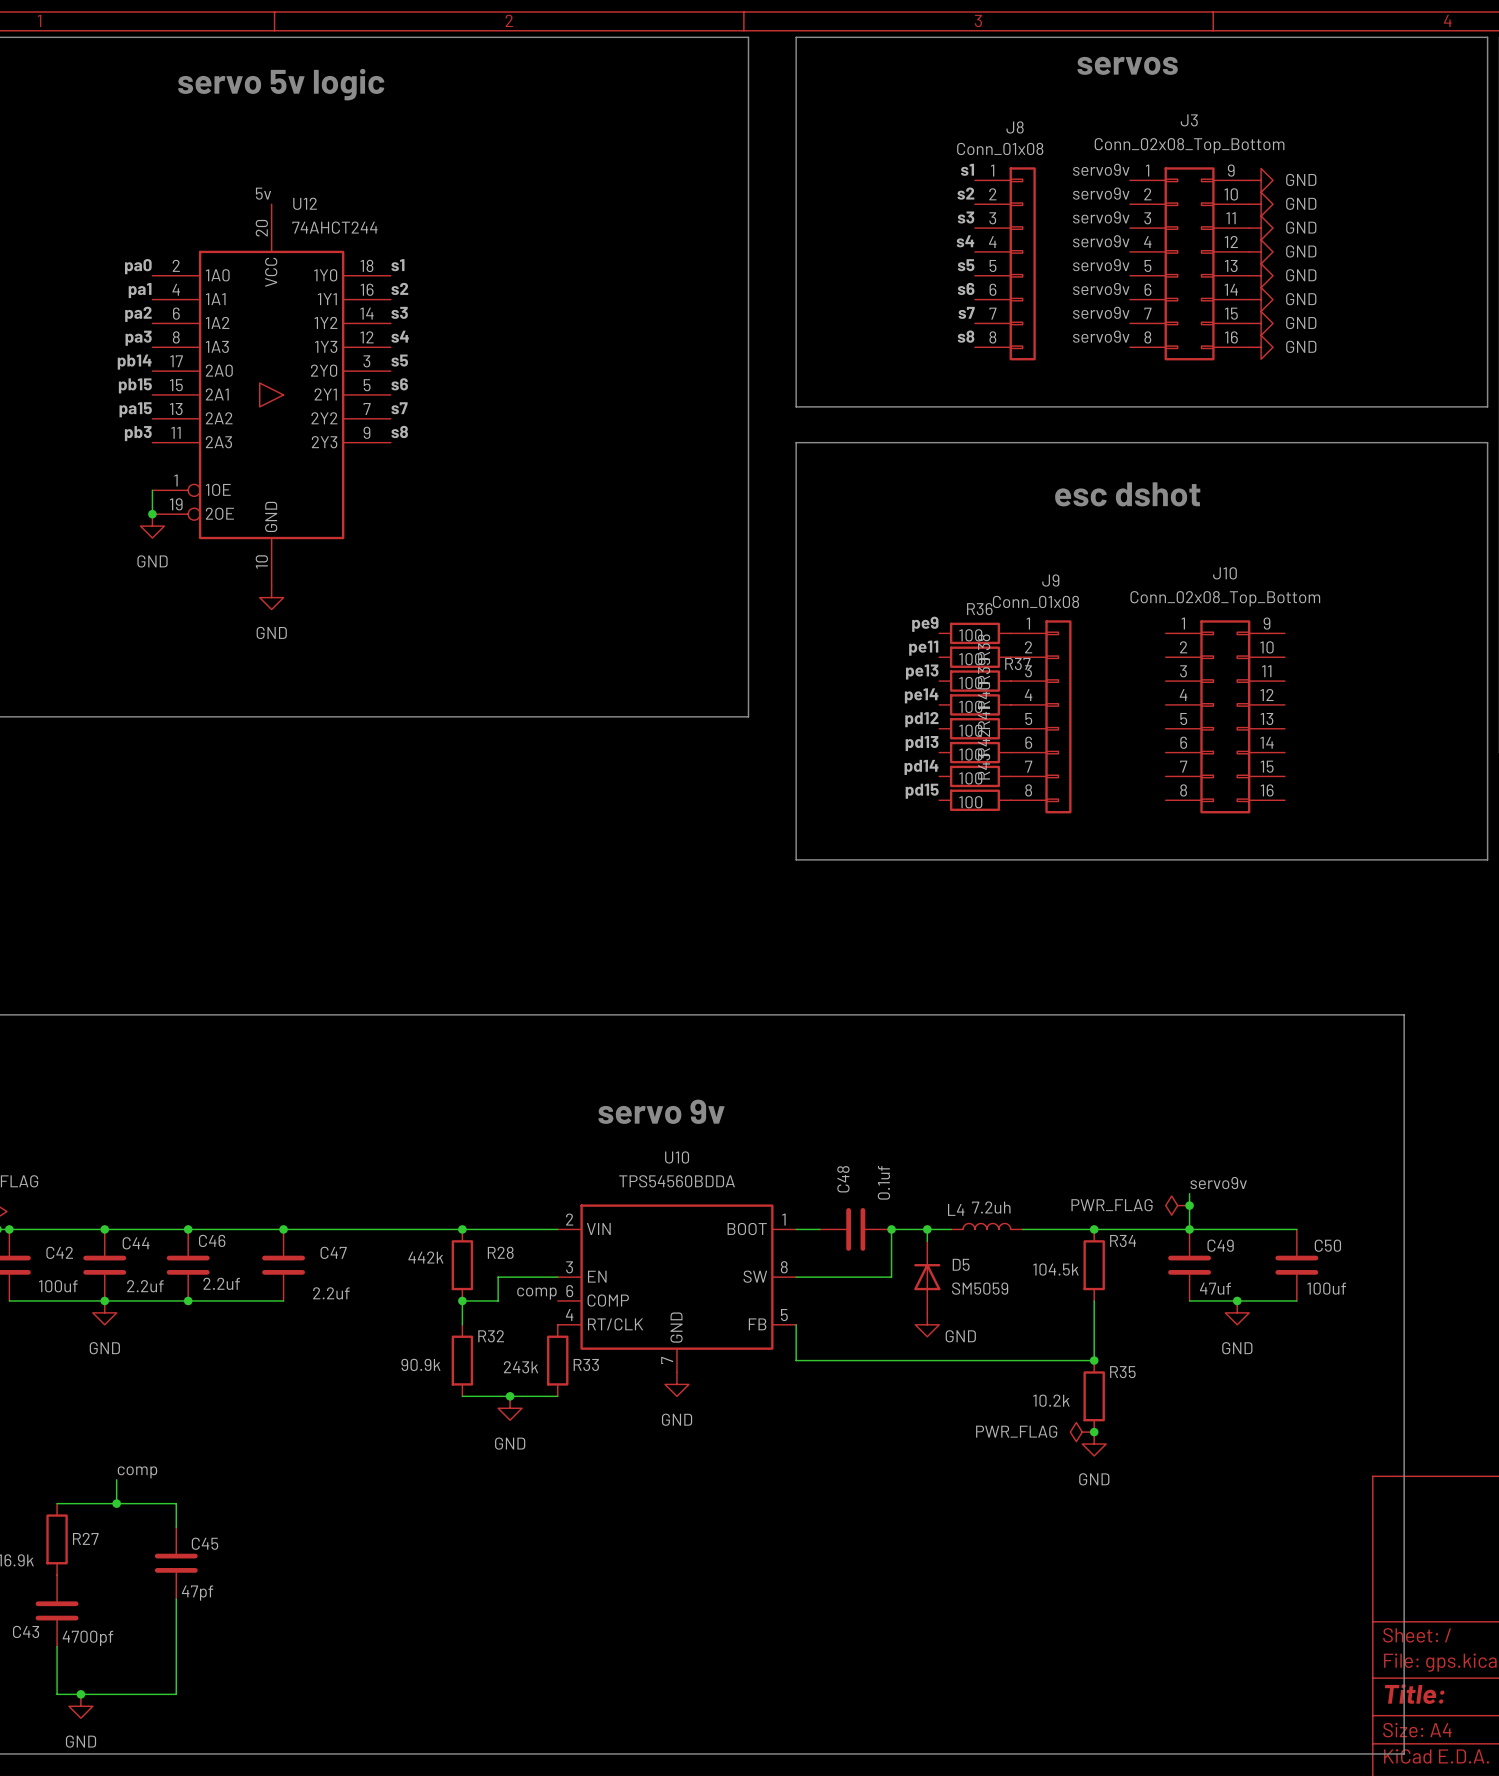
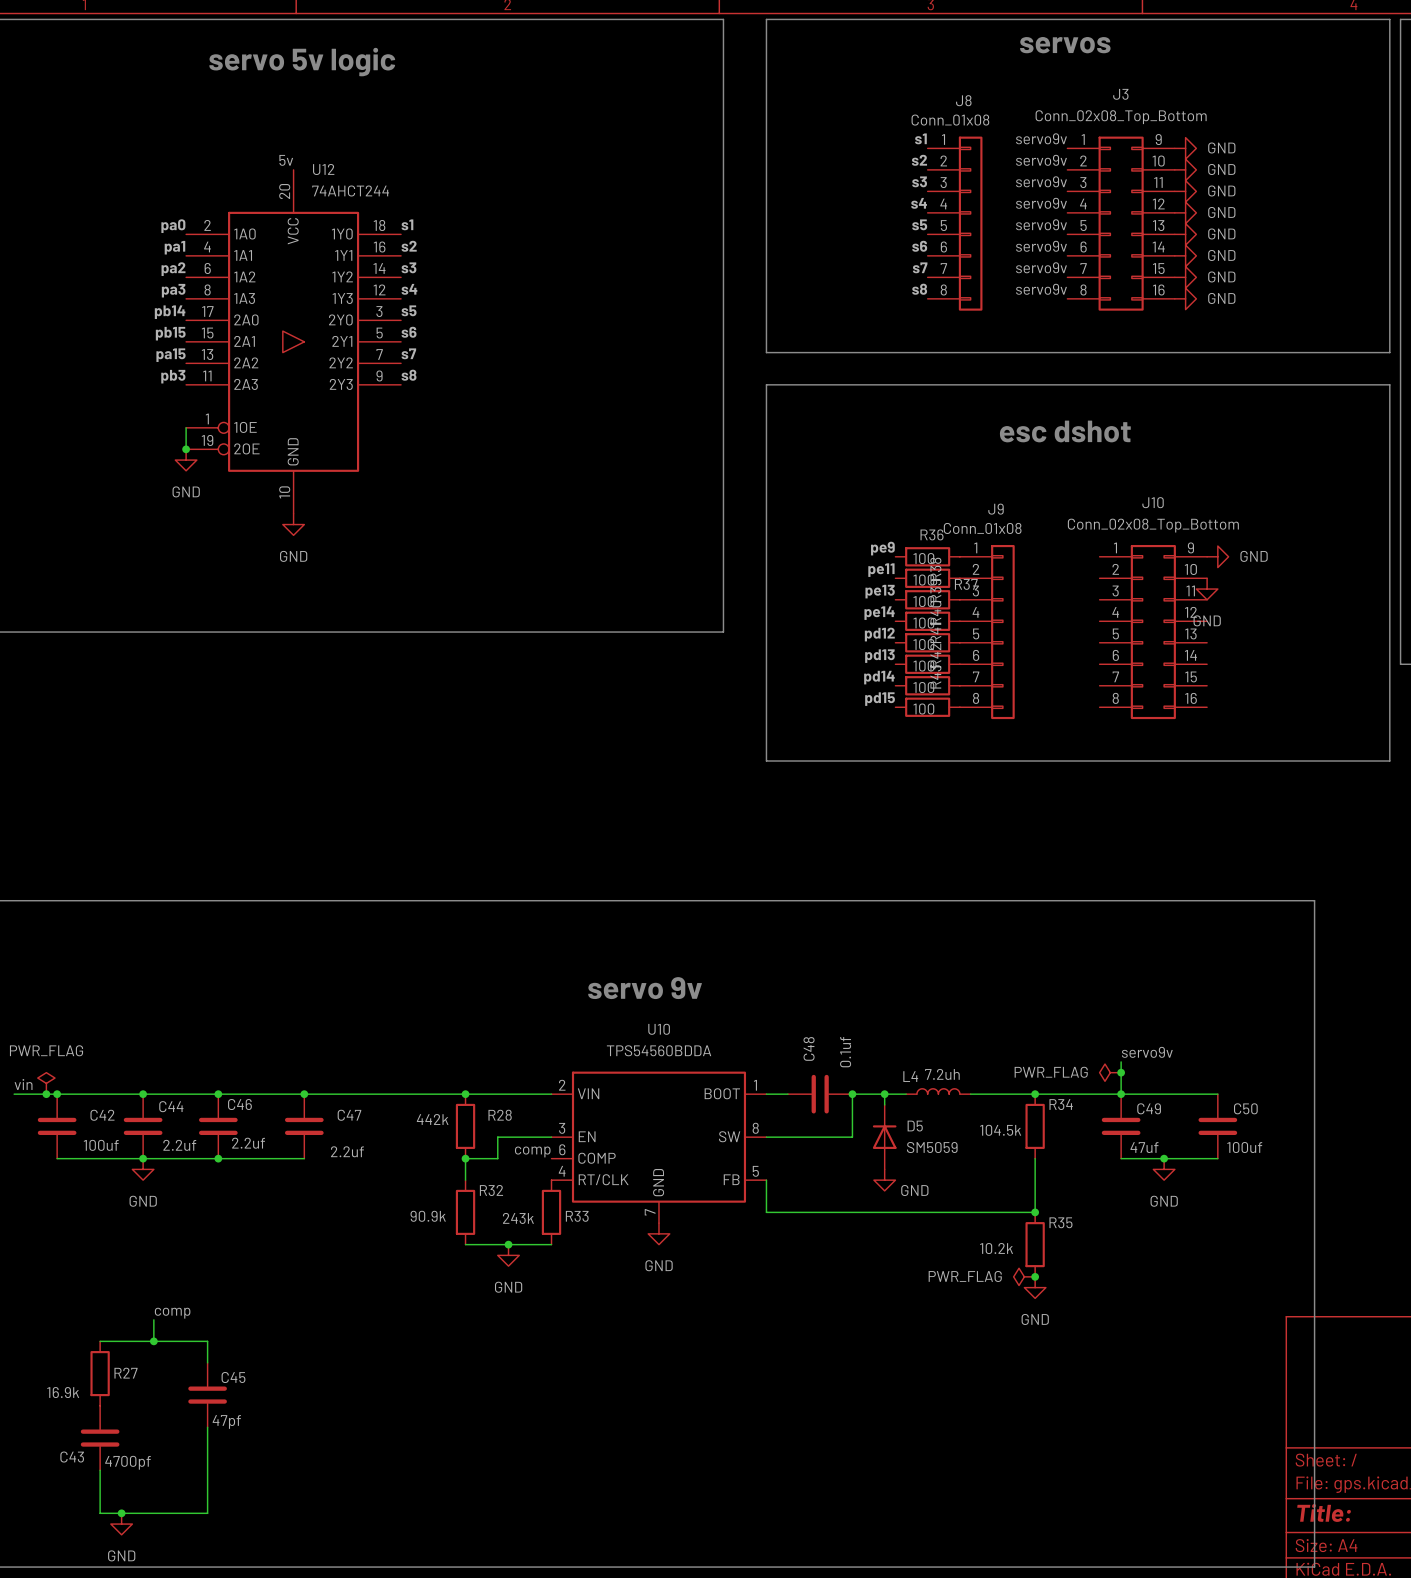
power symbol: none -> GND (1217, 556)
power symbol: none -> GND (1207, 589)

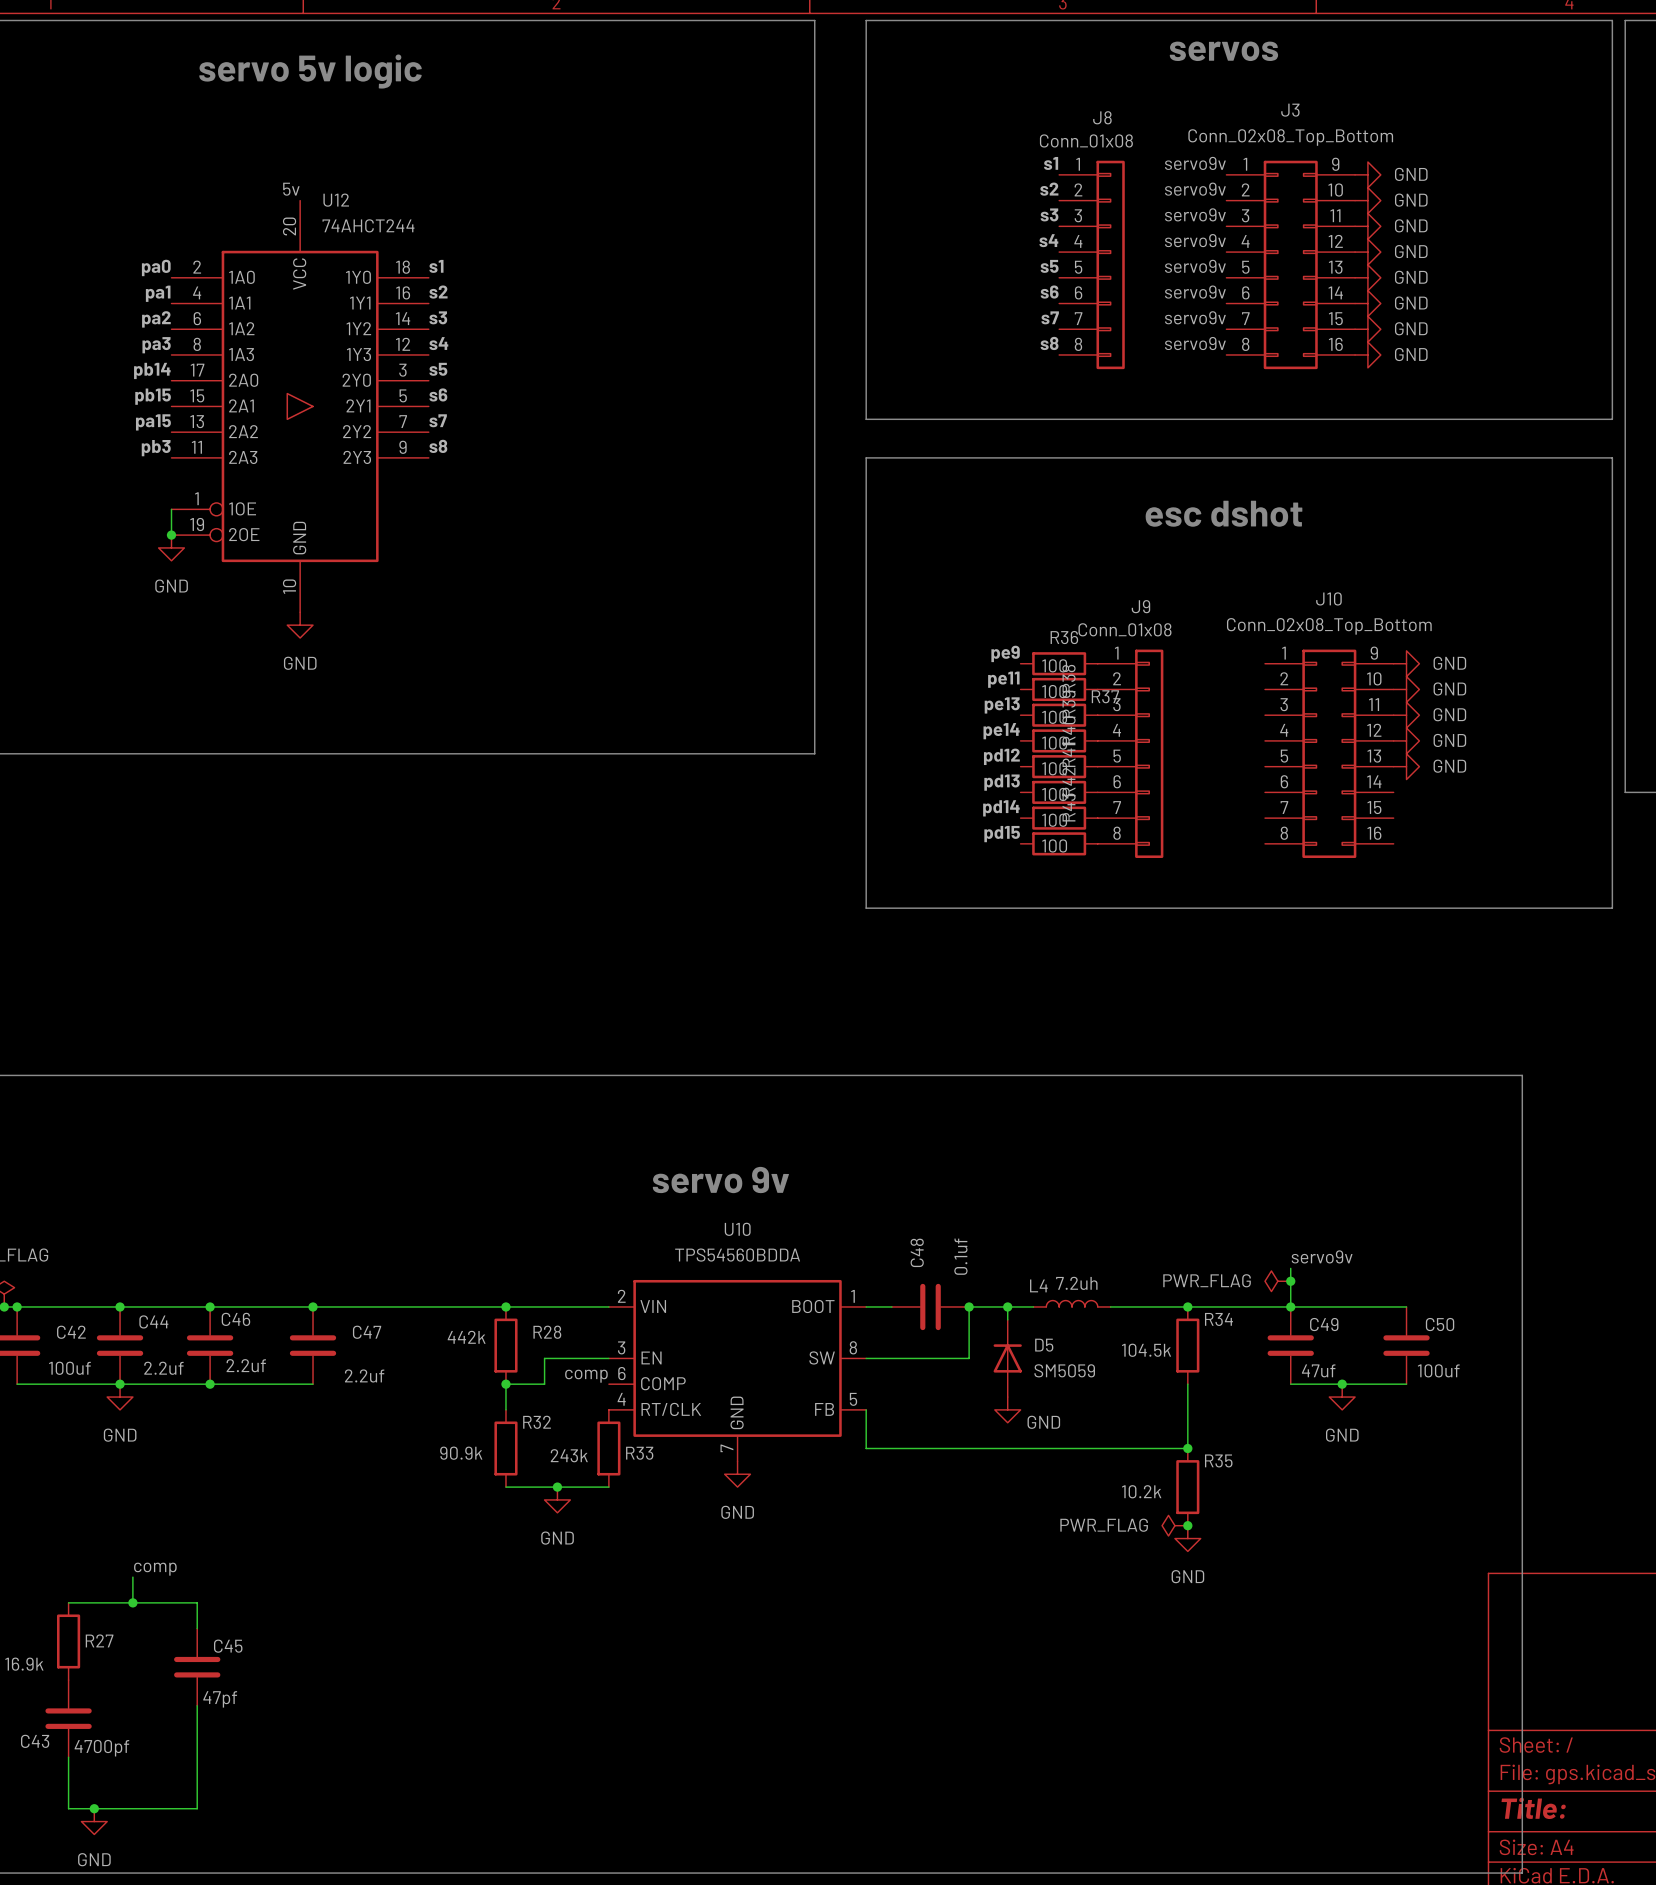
power symbol: none -> GND (1406, 689)
power symbol: GND (1207, 589) -> none
power symbol: none -> GND (1406, 715)
power symbol: none -> GND (1406, 740)
power symbol: none -> GND (1406, 766)

